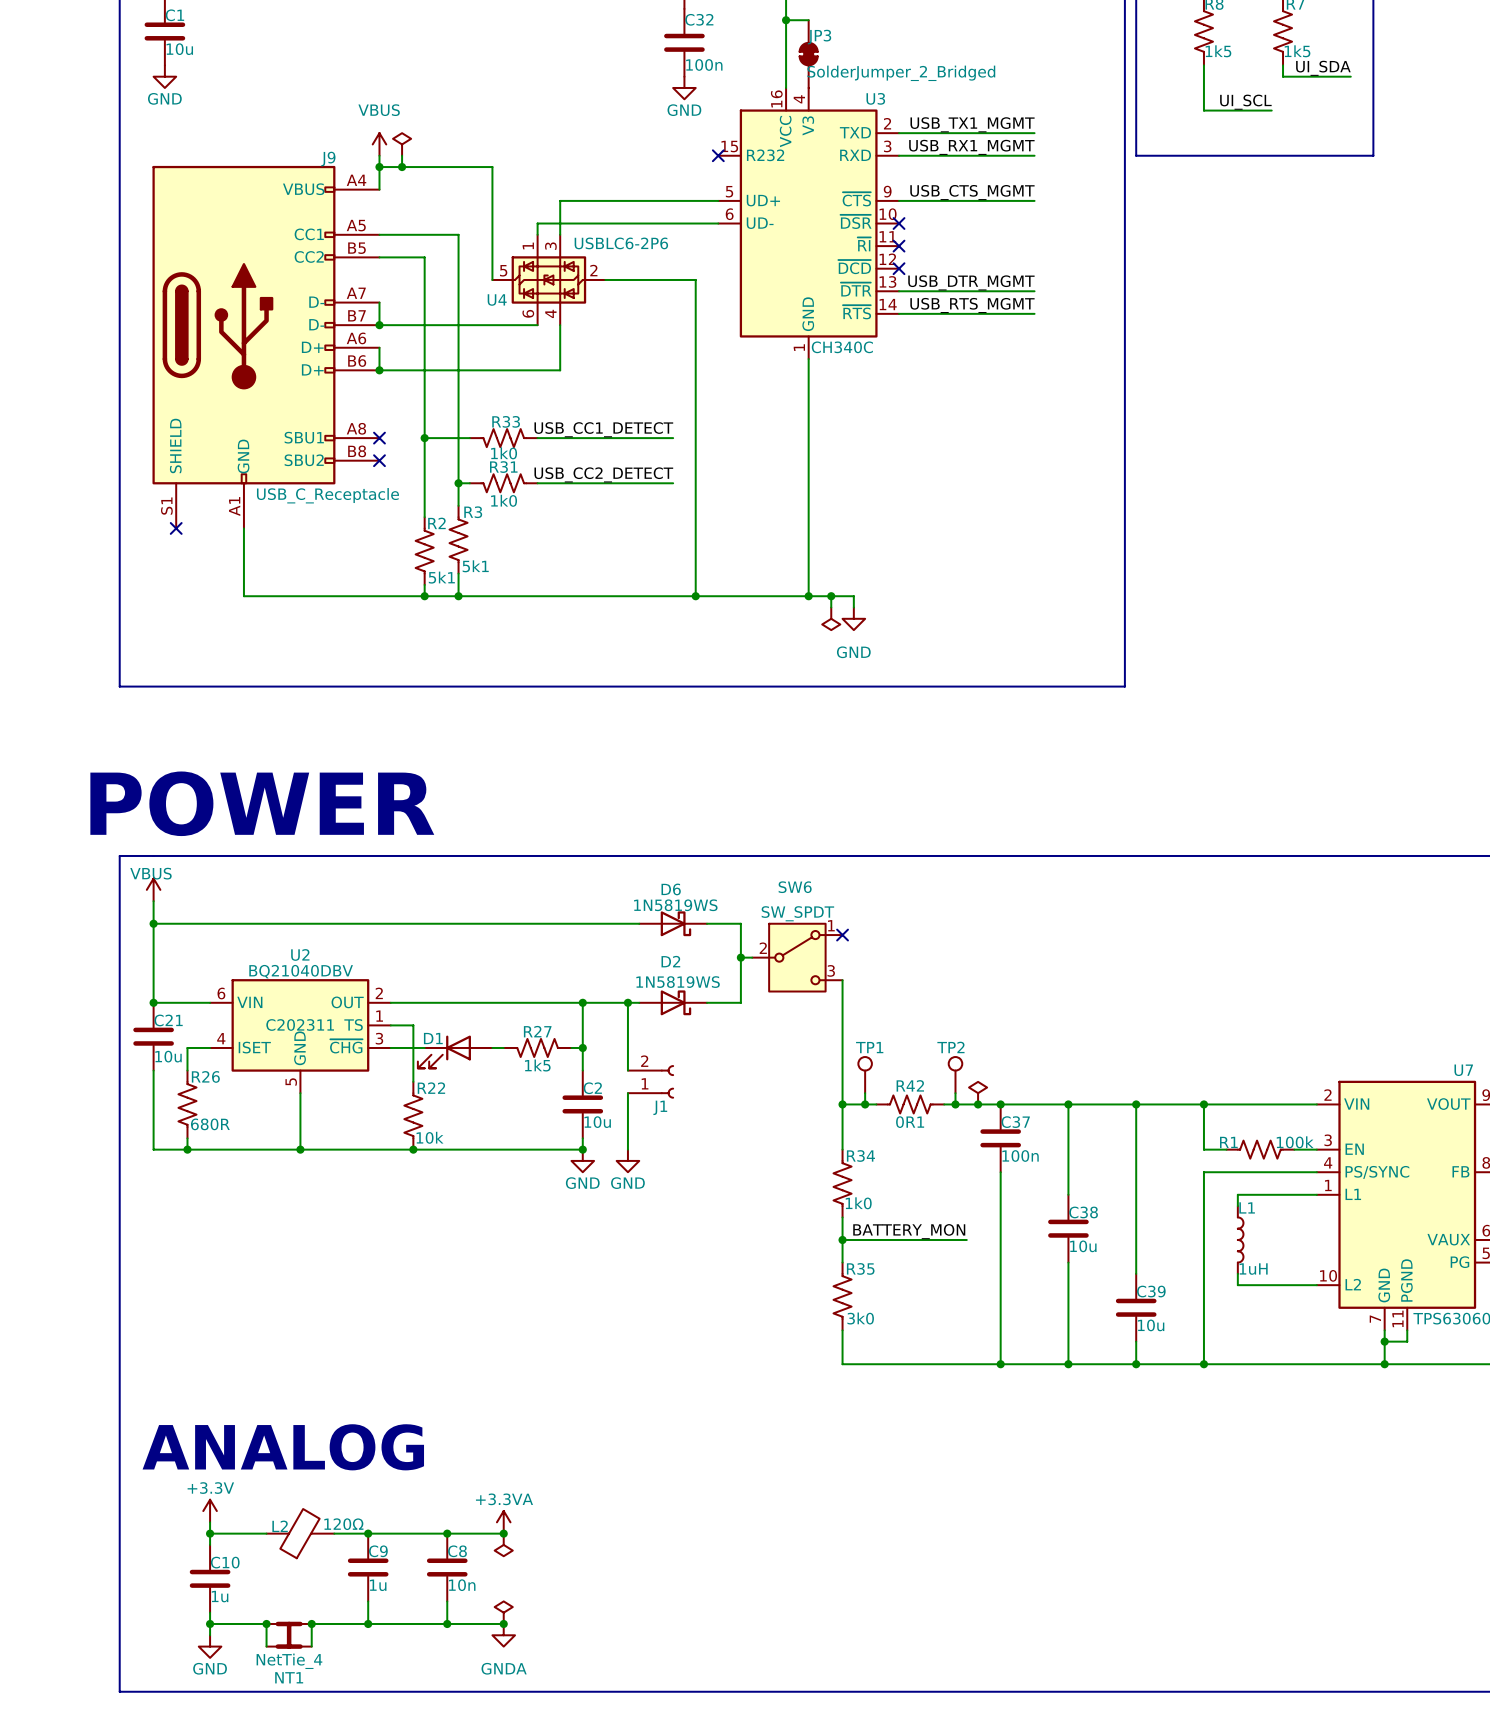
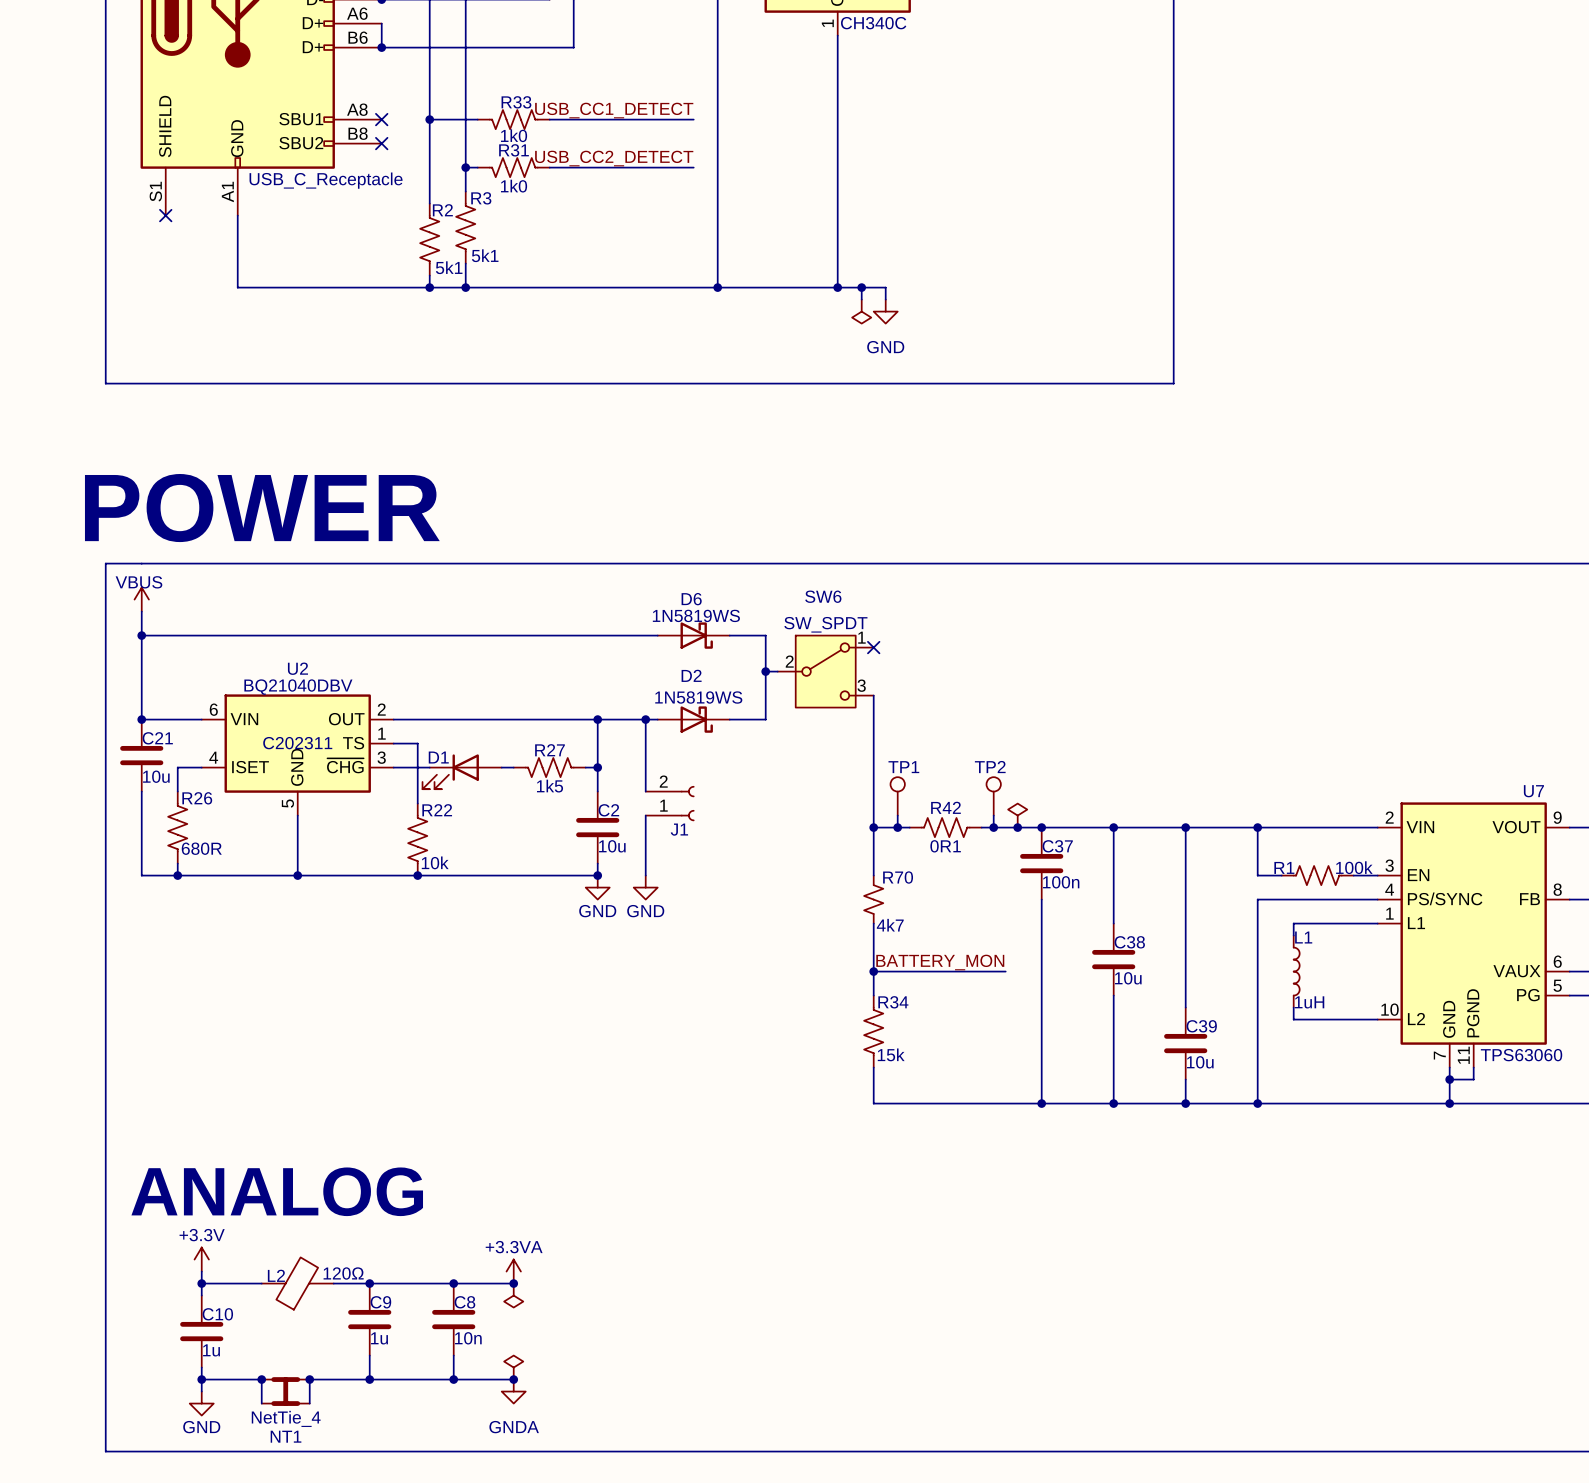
R70: none -> 4k7 (873, 899)
R34: 1k0 (842, 1183) -> none
R35 name: R35 (860, 1268) -> R34 (893, 1002)
R35 value: 3k0 (860, 1318) -> 15k (891, 1054)

